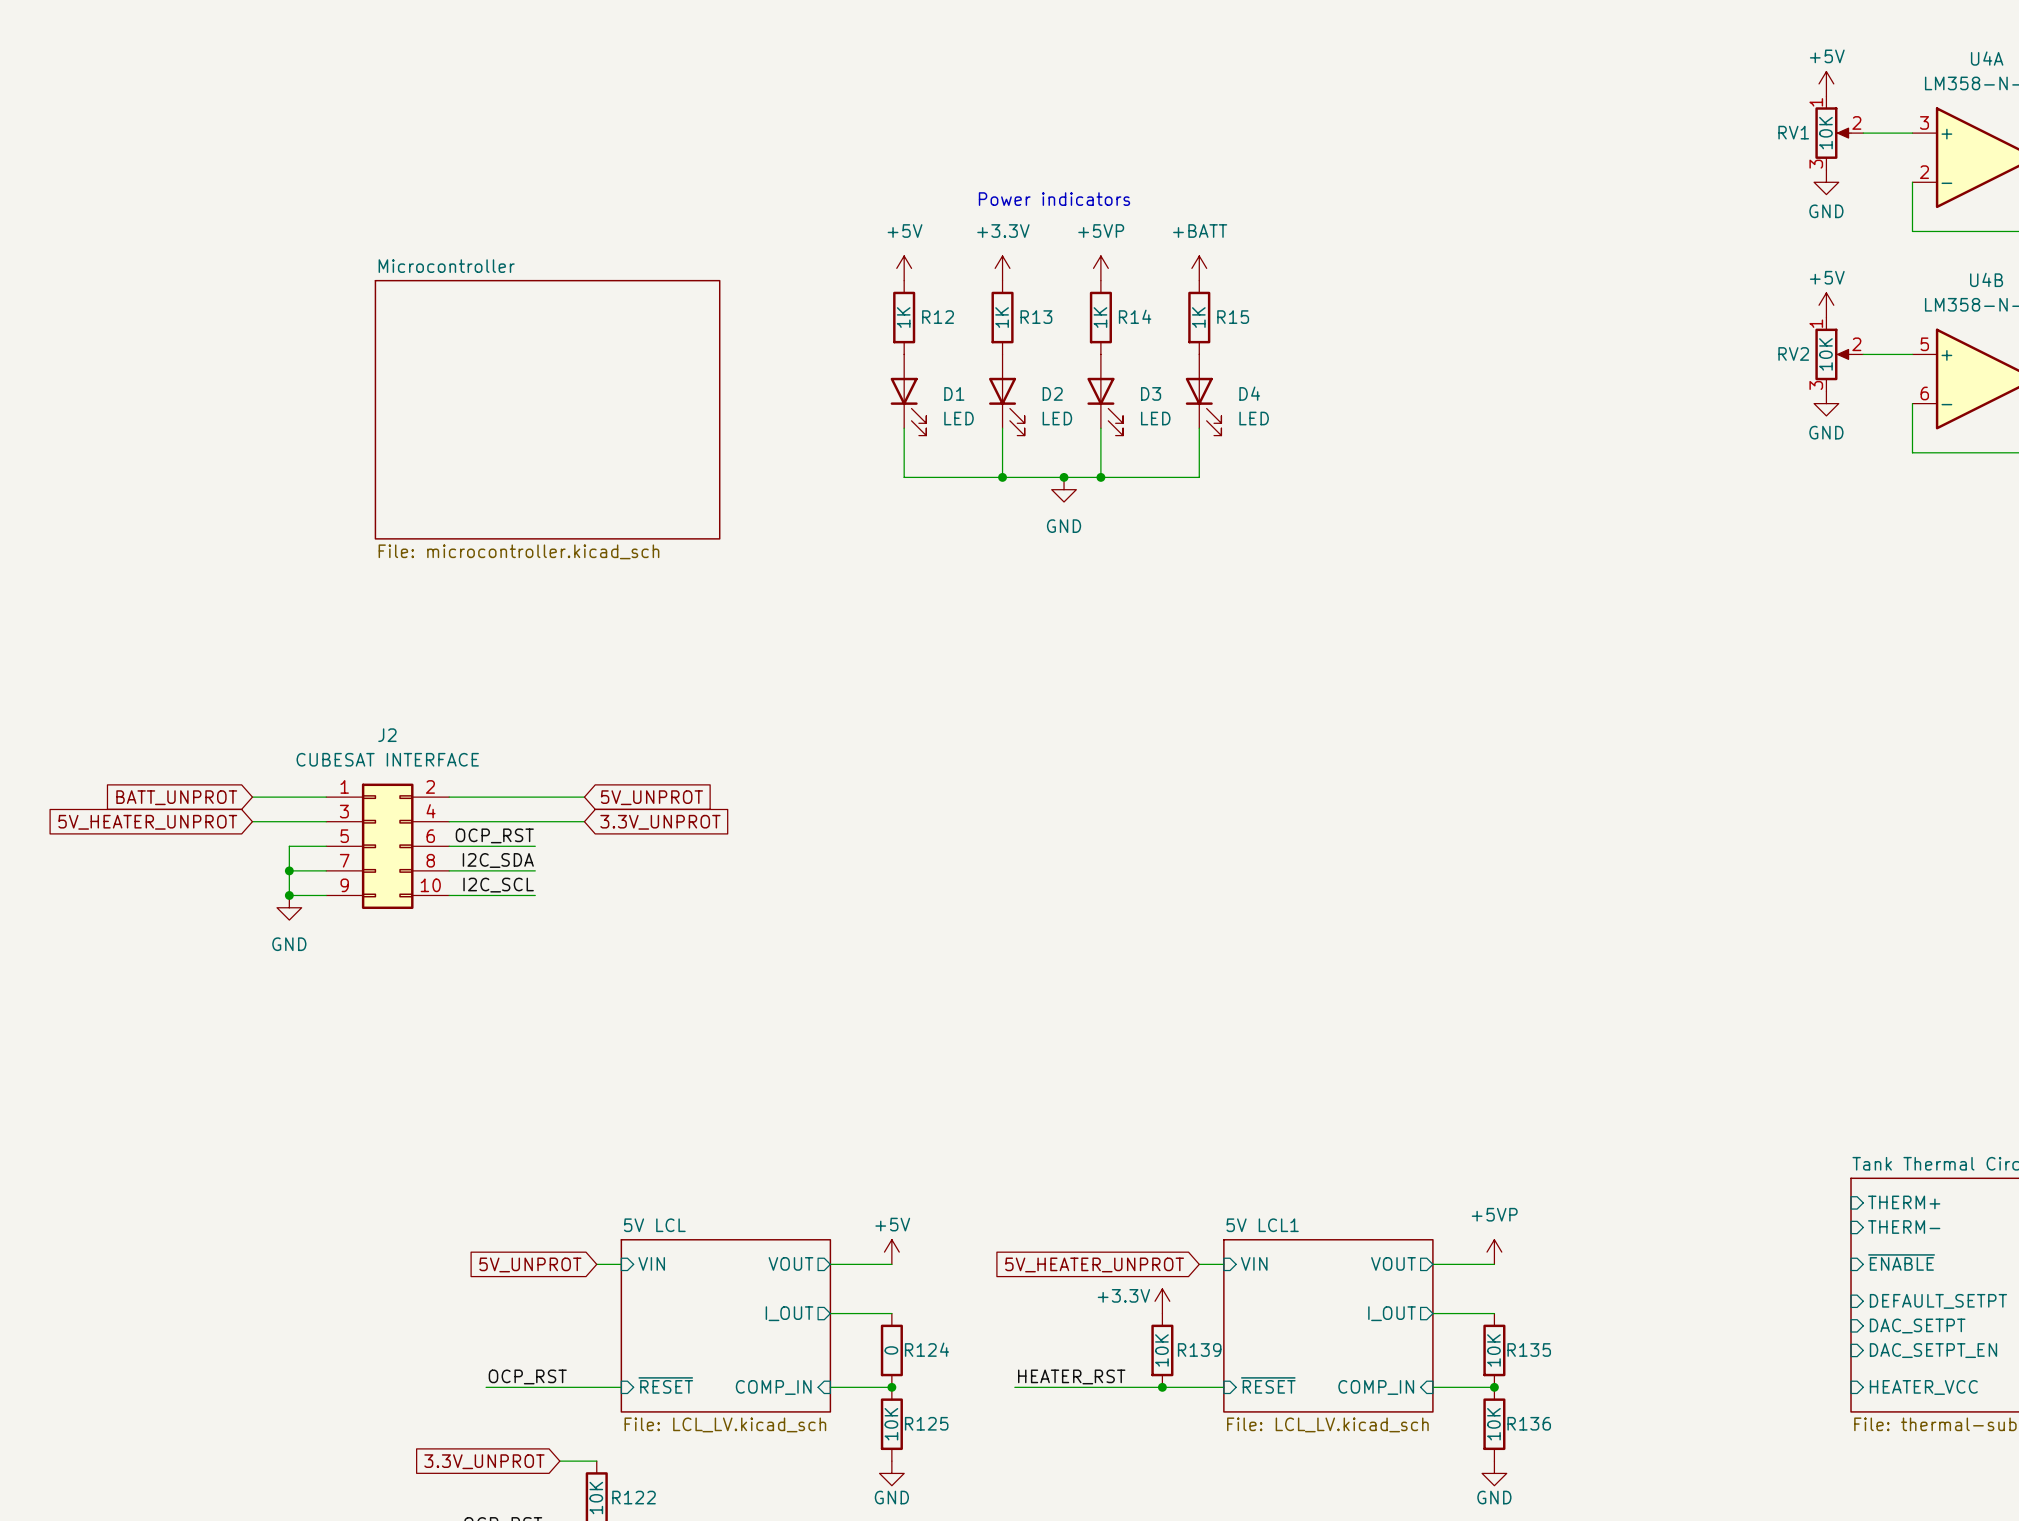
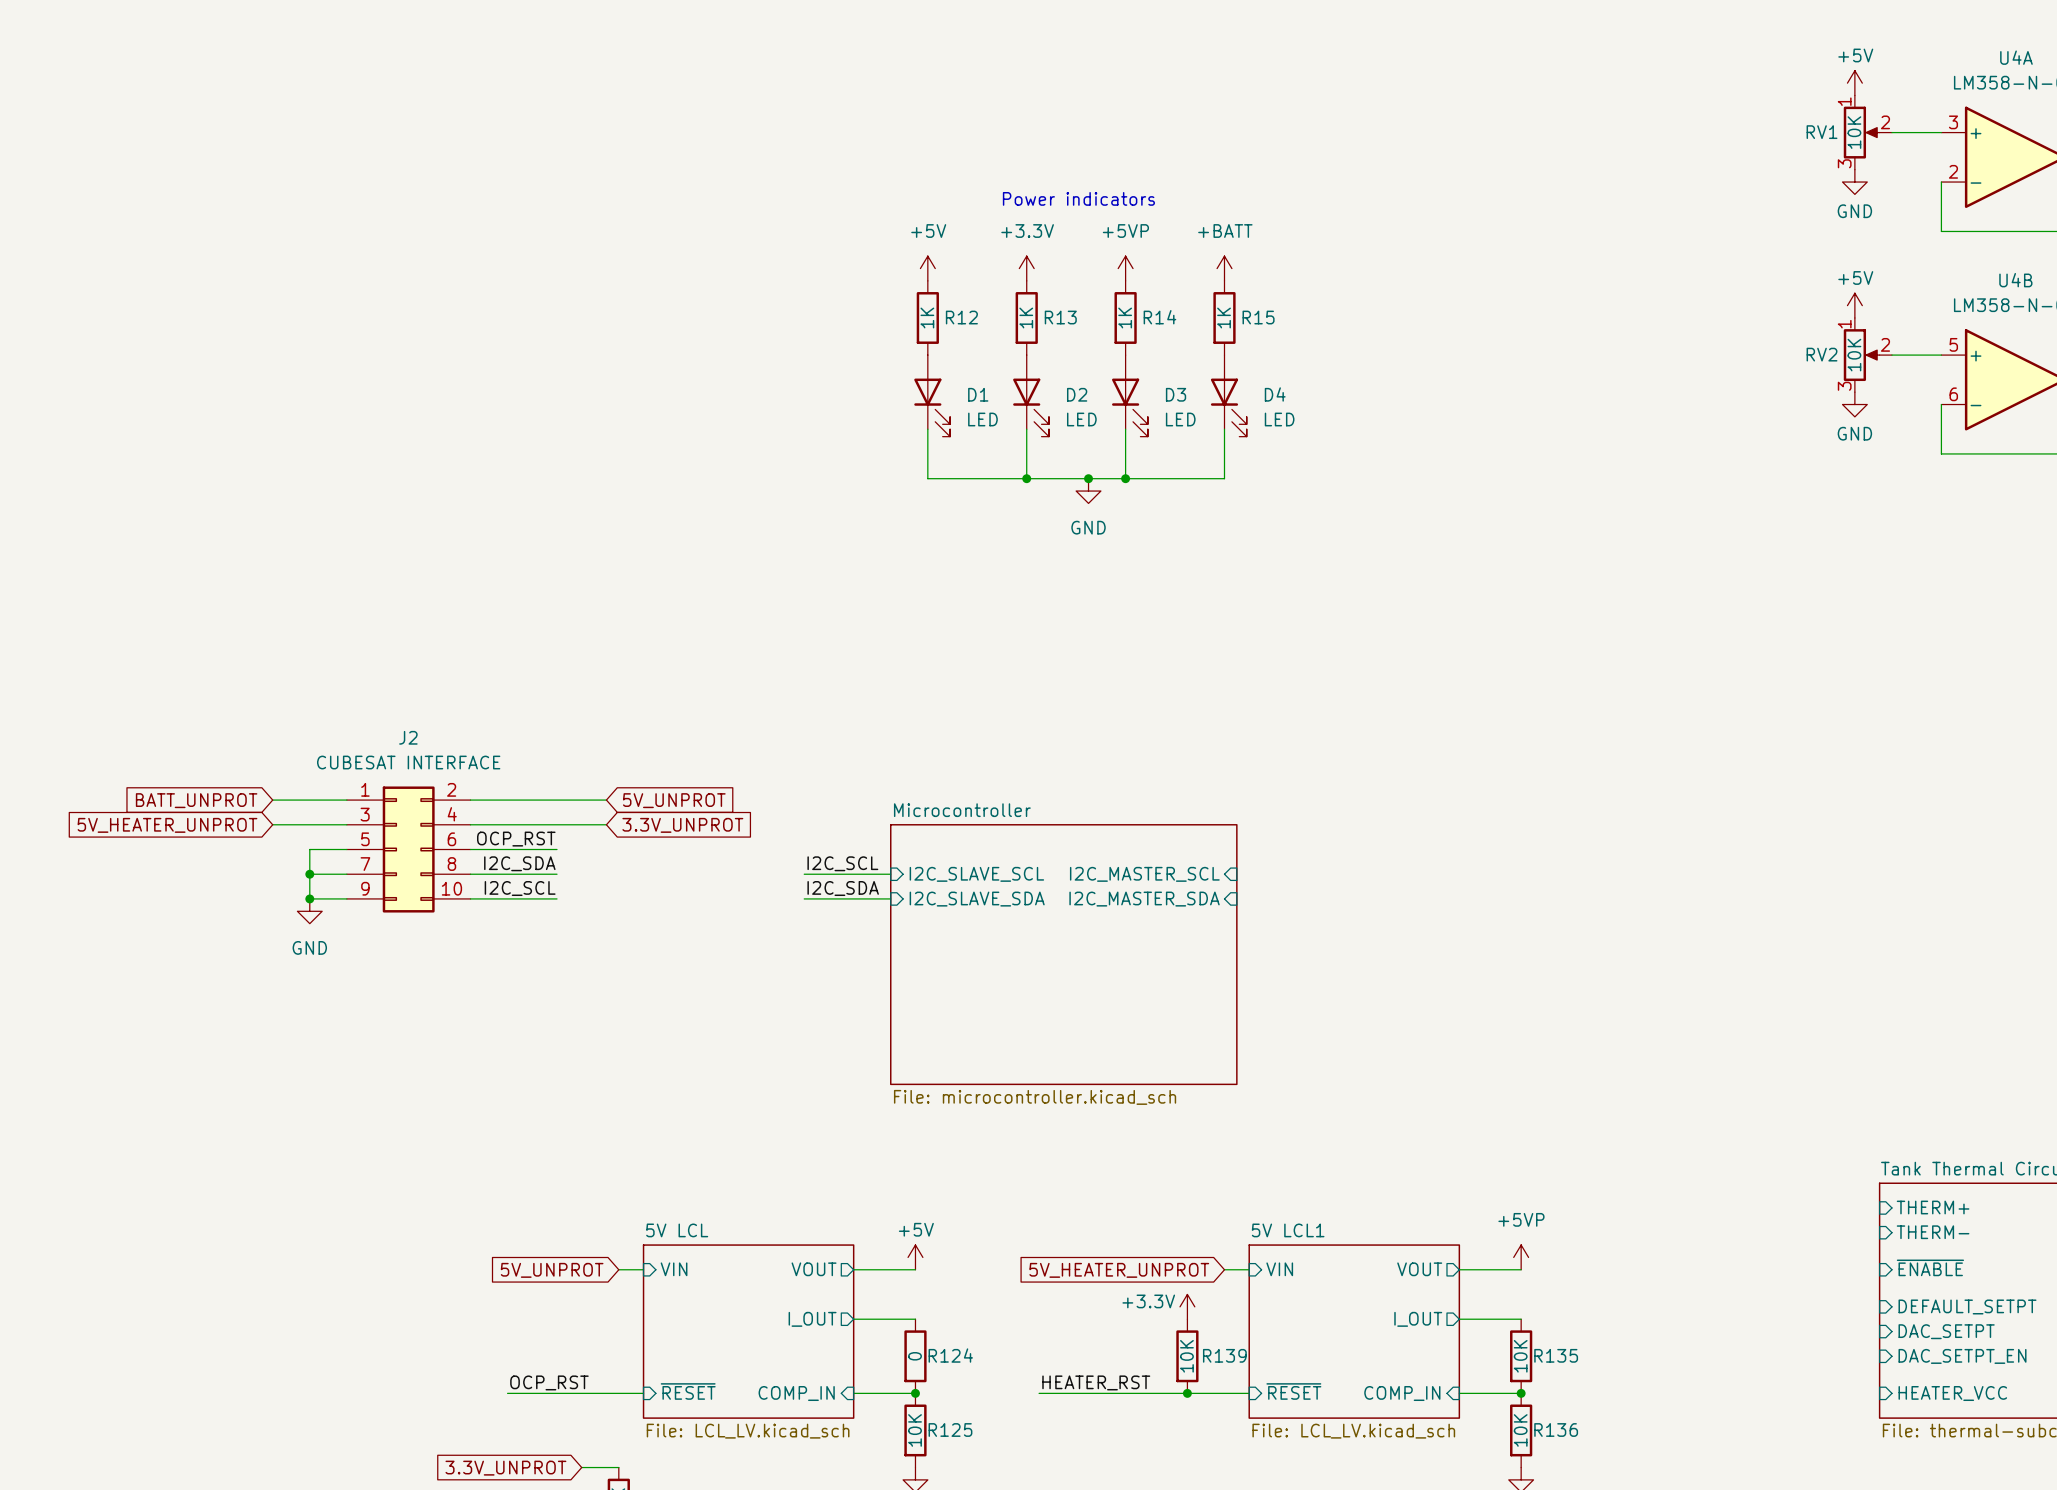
sheet Microcontroller: File: microcontroller.kicad_sch (547, 409) -> none
label: none -> I2C_SCL (842, 863)
wire: none -> (804, 874) (890, 874)
sheet pin: none -> I2C_SLAVE_SCL (976, 874)
sheet pin: none -> I2C_MASTER_SCL (1144, 874)
label: none -> I2C_SDA (843, 888)
wire: none -> (804, 898) (890, 898)
sheet pin: none -> I2C_SLAVE_SDA (977, 899)
sheet pin: none -> I2C_MASTER_SDA (1144, 899)
sheet Microcontroller: none -> File: microcontroller.kicad_sch (1063, 954)

